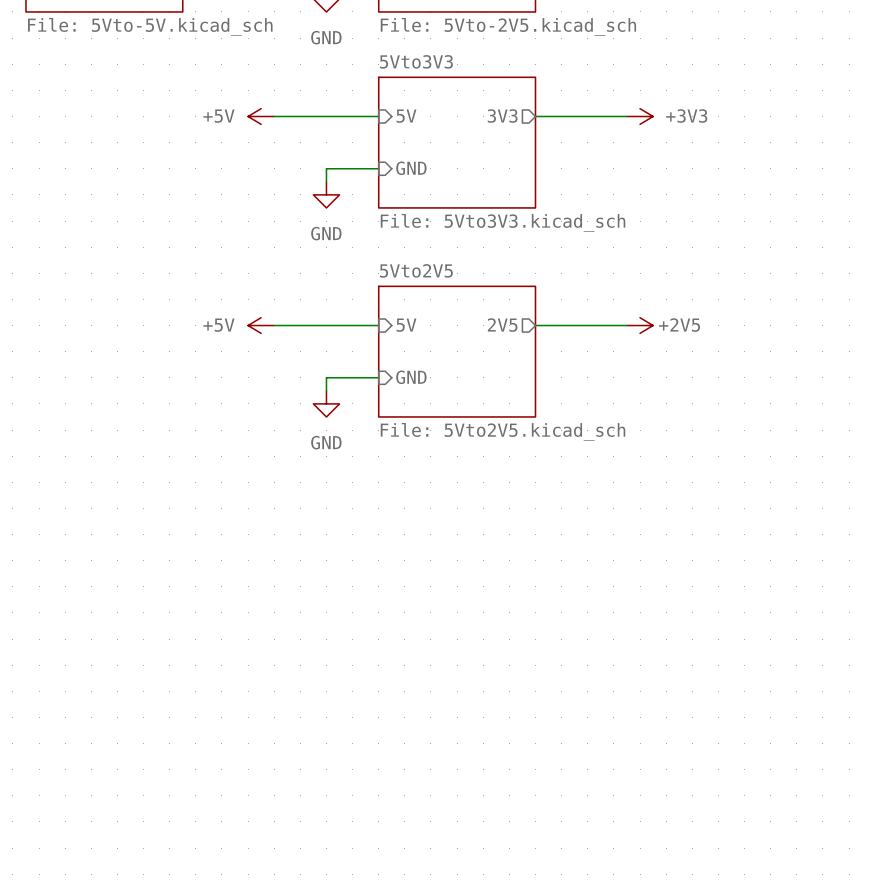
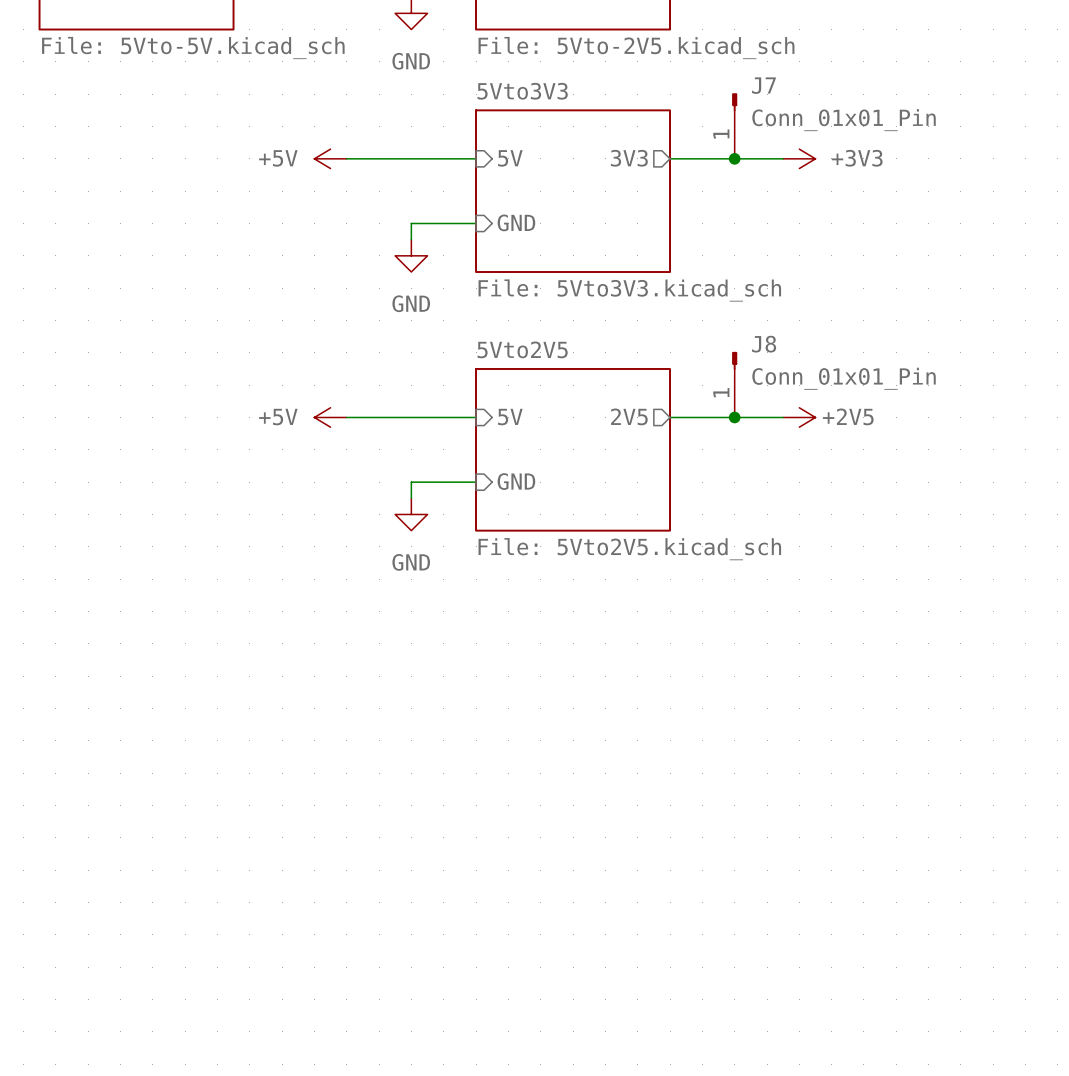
J7: none -> Conn_01x01_Pin (734, 126)
junction: none -> (734, 158)
J8: none -> Conn_01x01_Pin (734, 384)
junction: none -> (734, 417)

